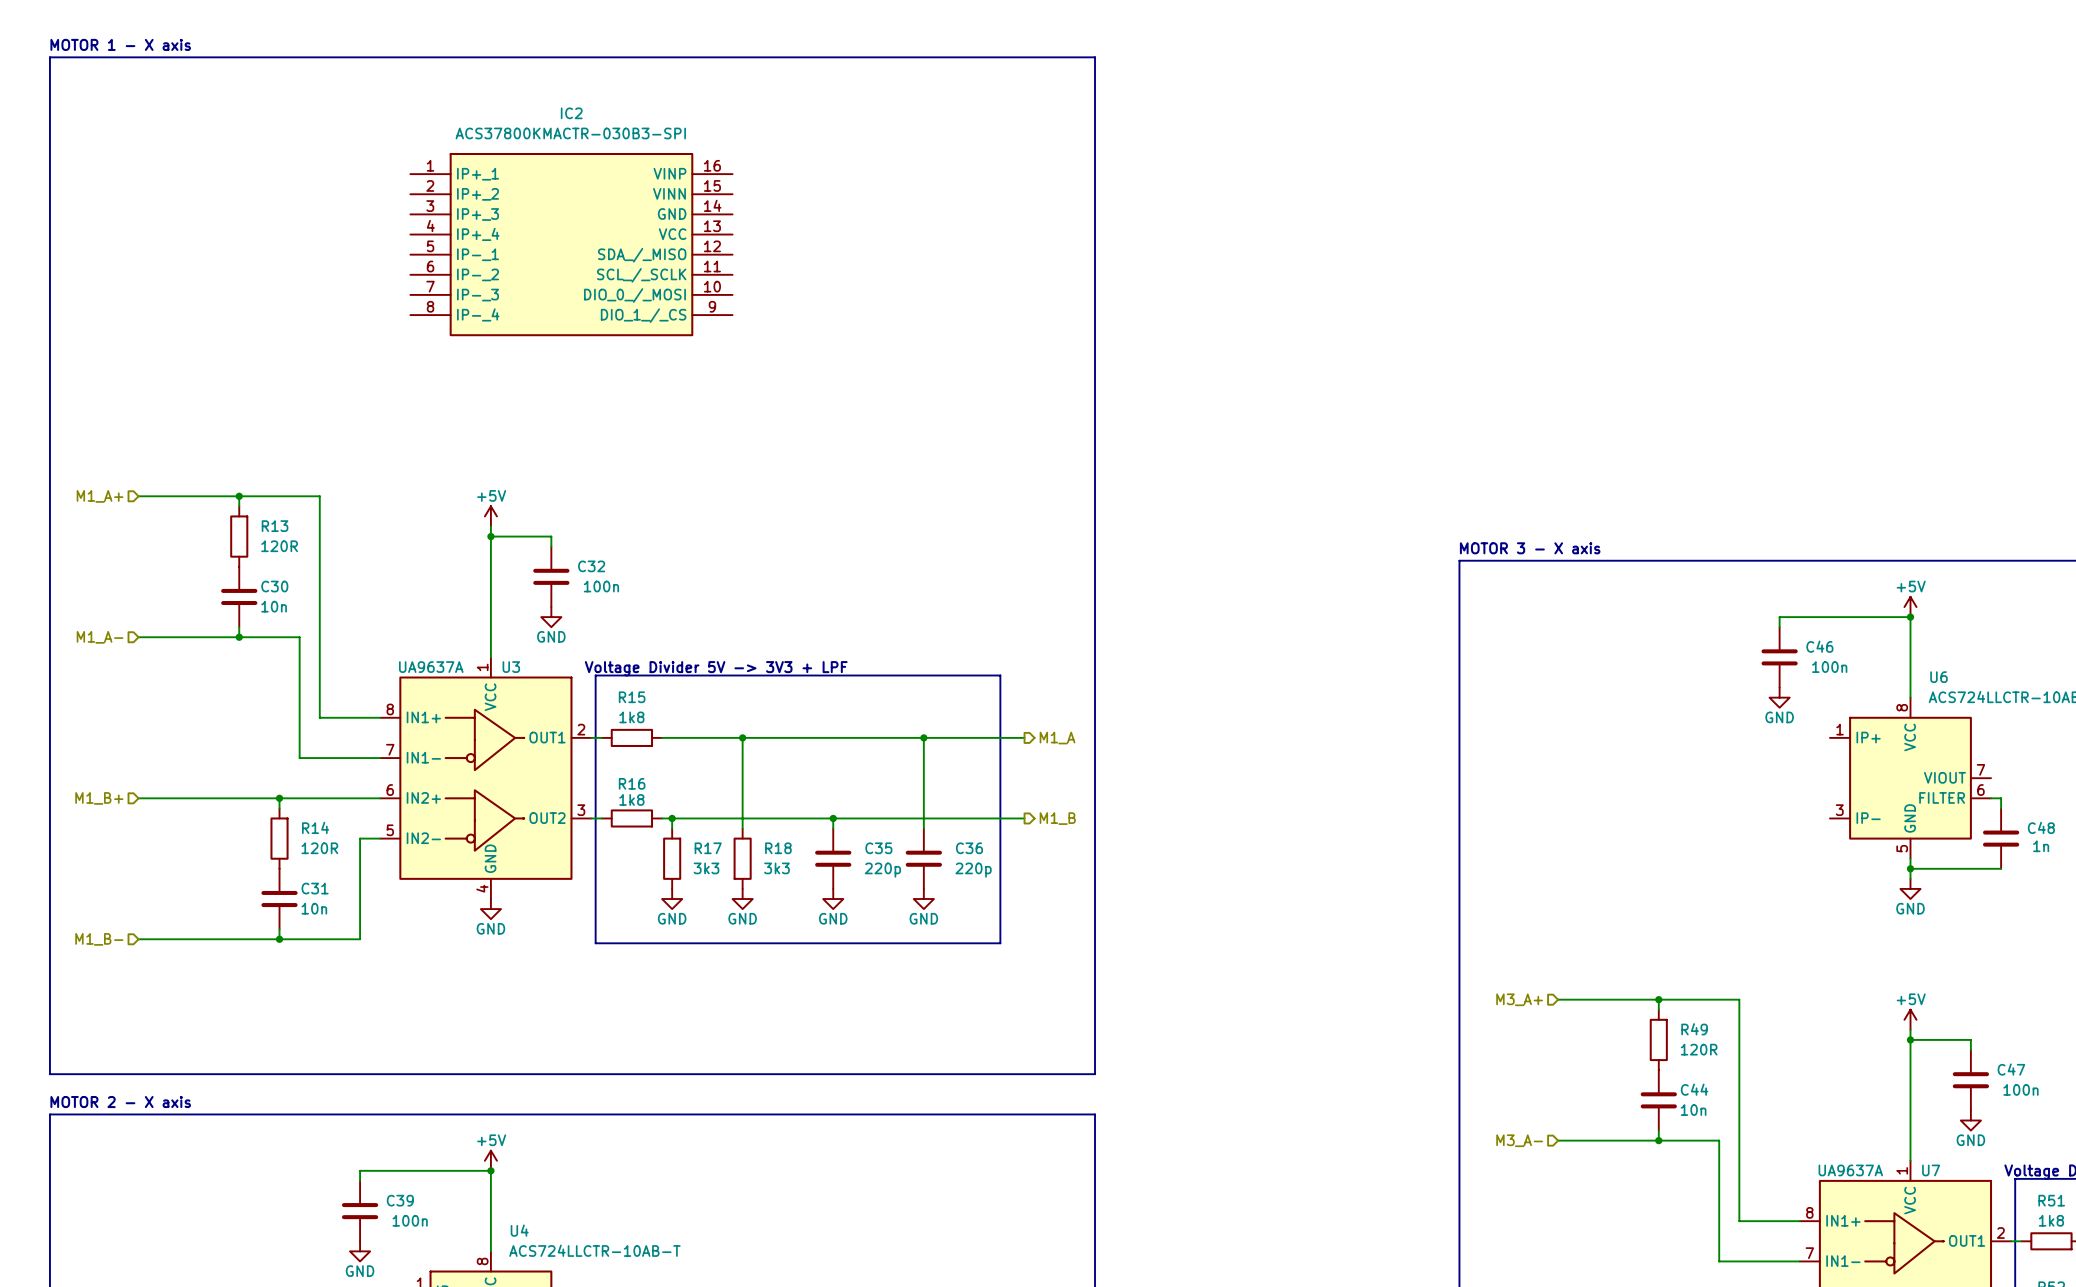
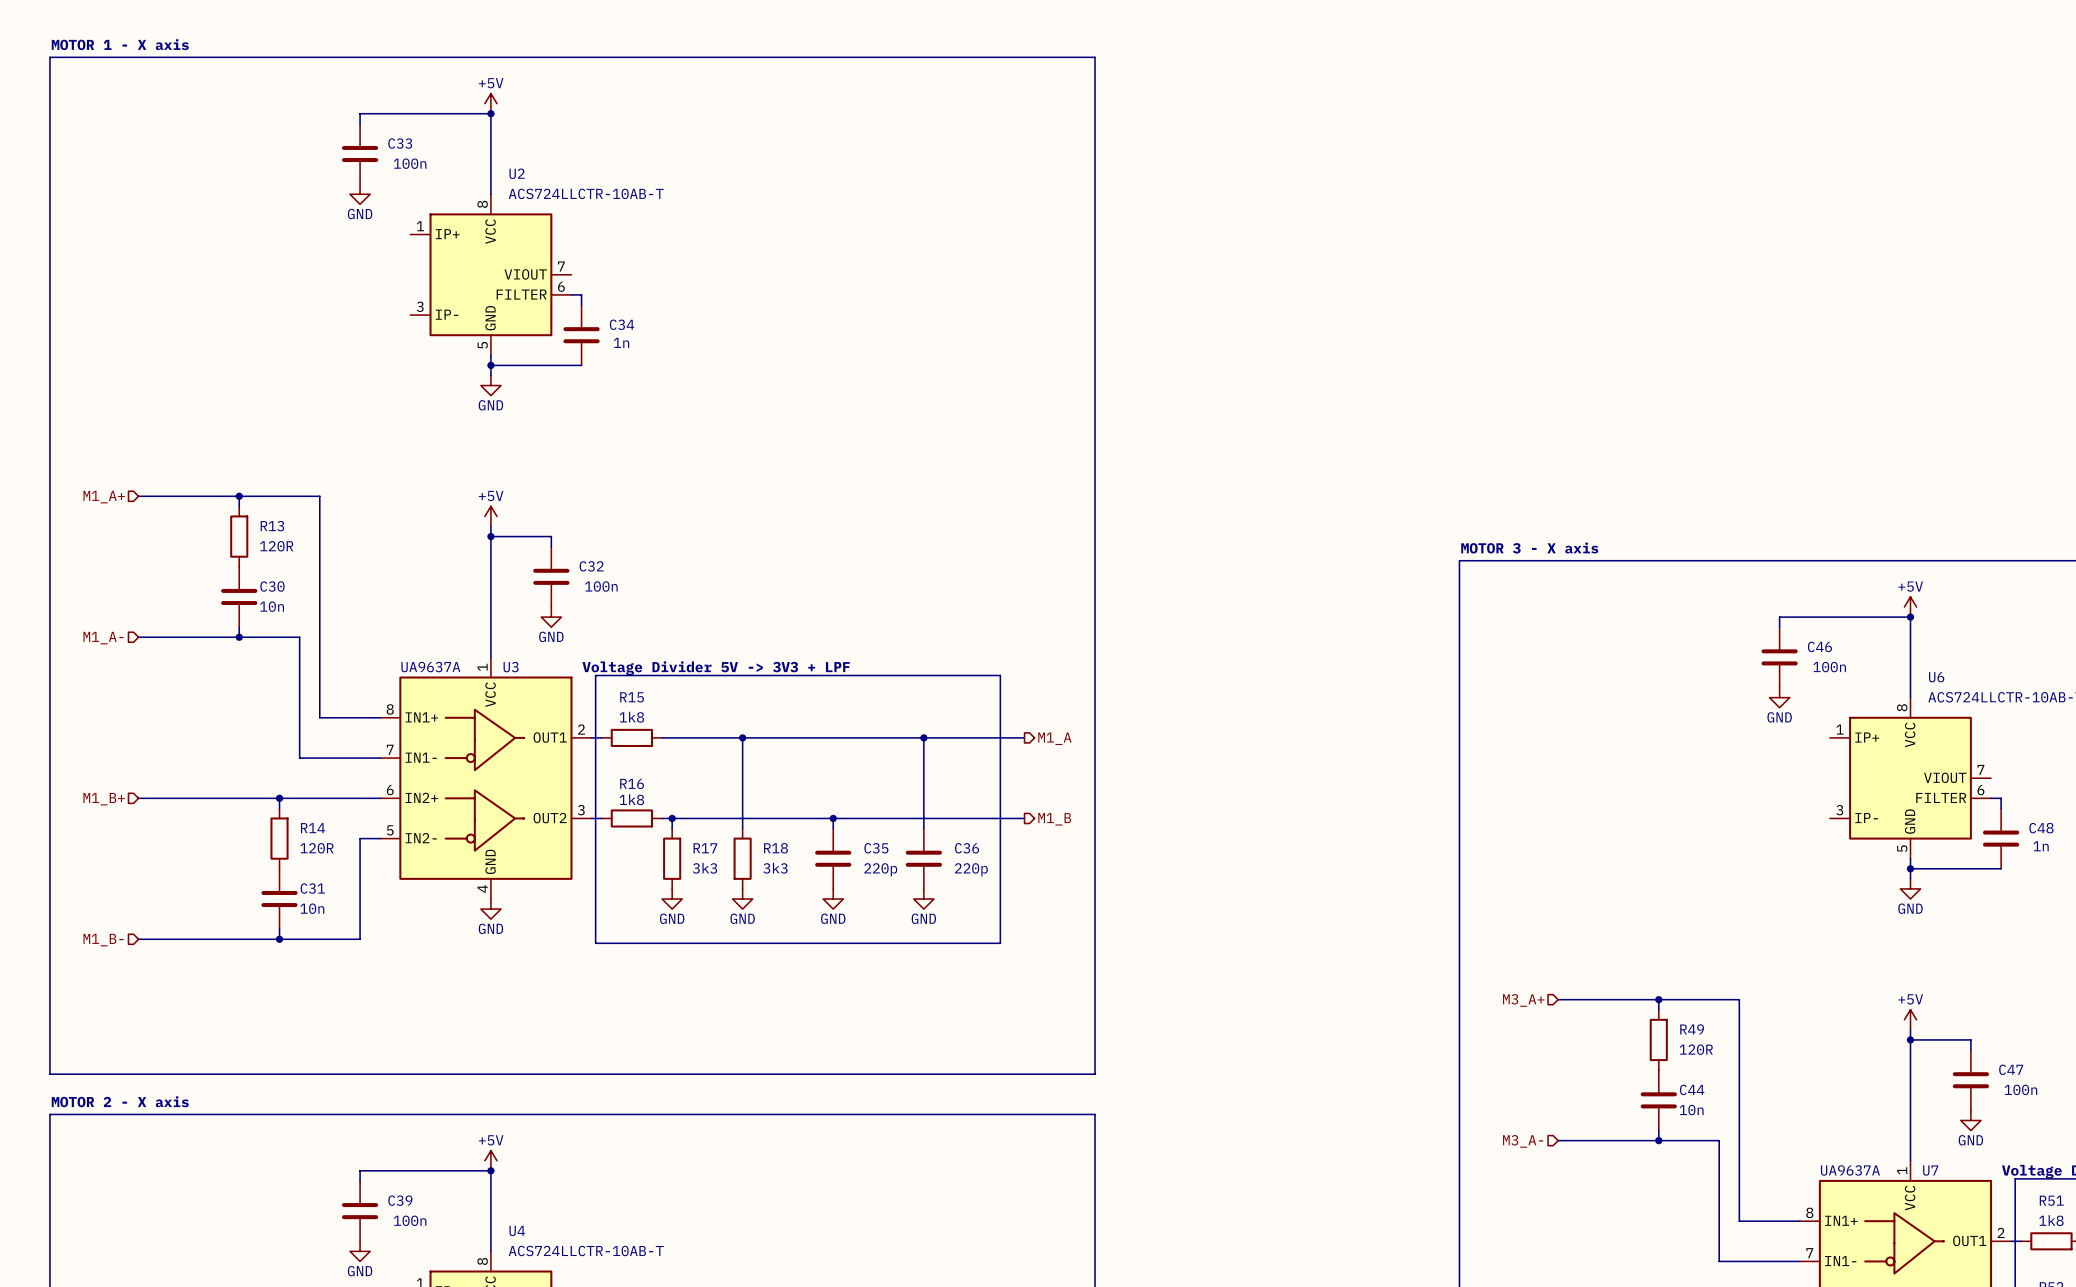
power symbol: none -> +5V (490, 103)
junction: none -> (490, 113)
wire: none -> (360, 123) (360, 113) (490, 113) (490, 194)
C33: none -> 100n (360, 153)
power symbol: none -> GND (360, 194)
IC2: ACS37800KMACTR-030B3-SPI (571, 244) -> none
U2: none -> ACS724LLCTR-10AB-T (490, 274)
C34: none -> 1n (581, 335)
wire: none -> (490, 355) (490, 375)
wire: none -> (490, 365) (581, 365)
junction: none -> (490, 365)
power symbol: none -> GND (490, 385)

